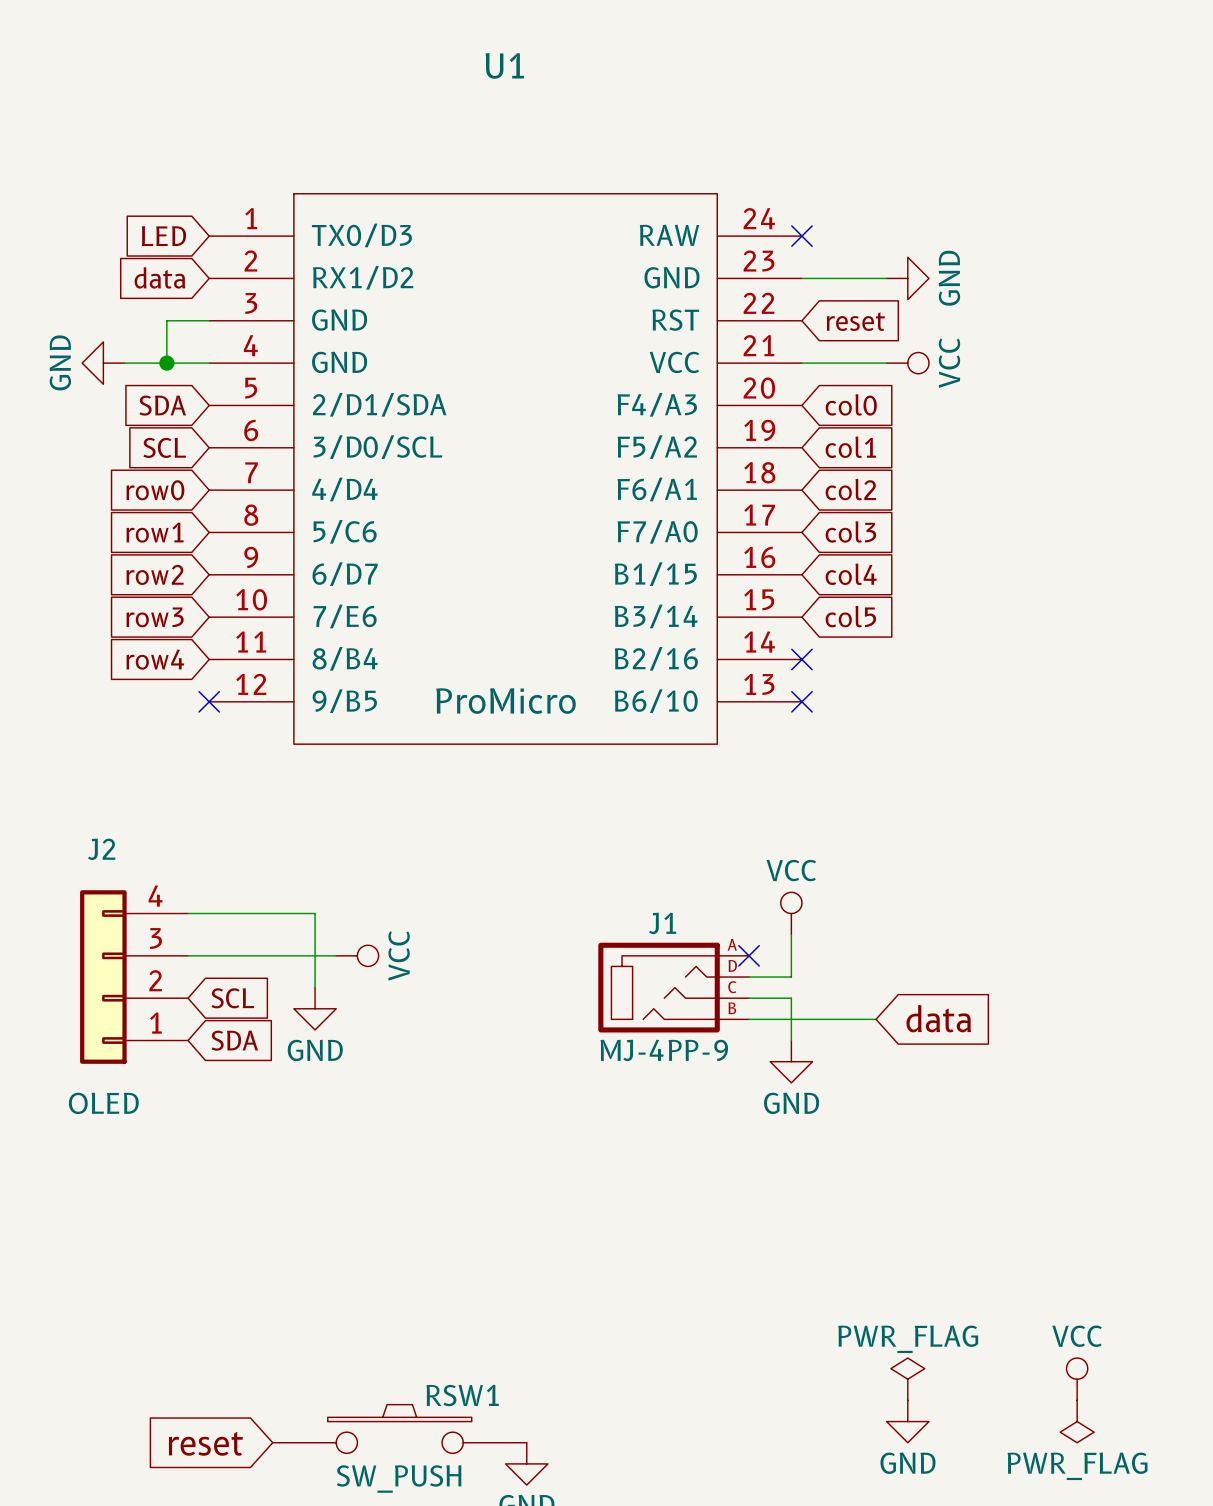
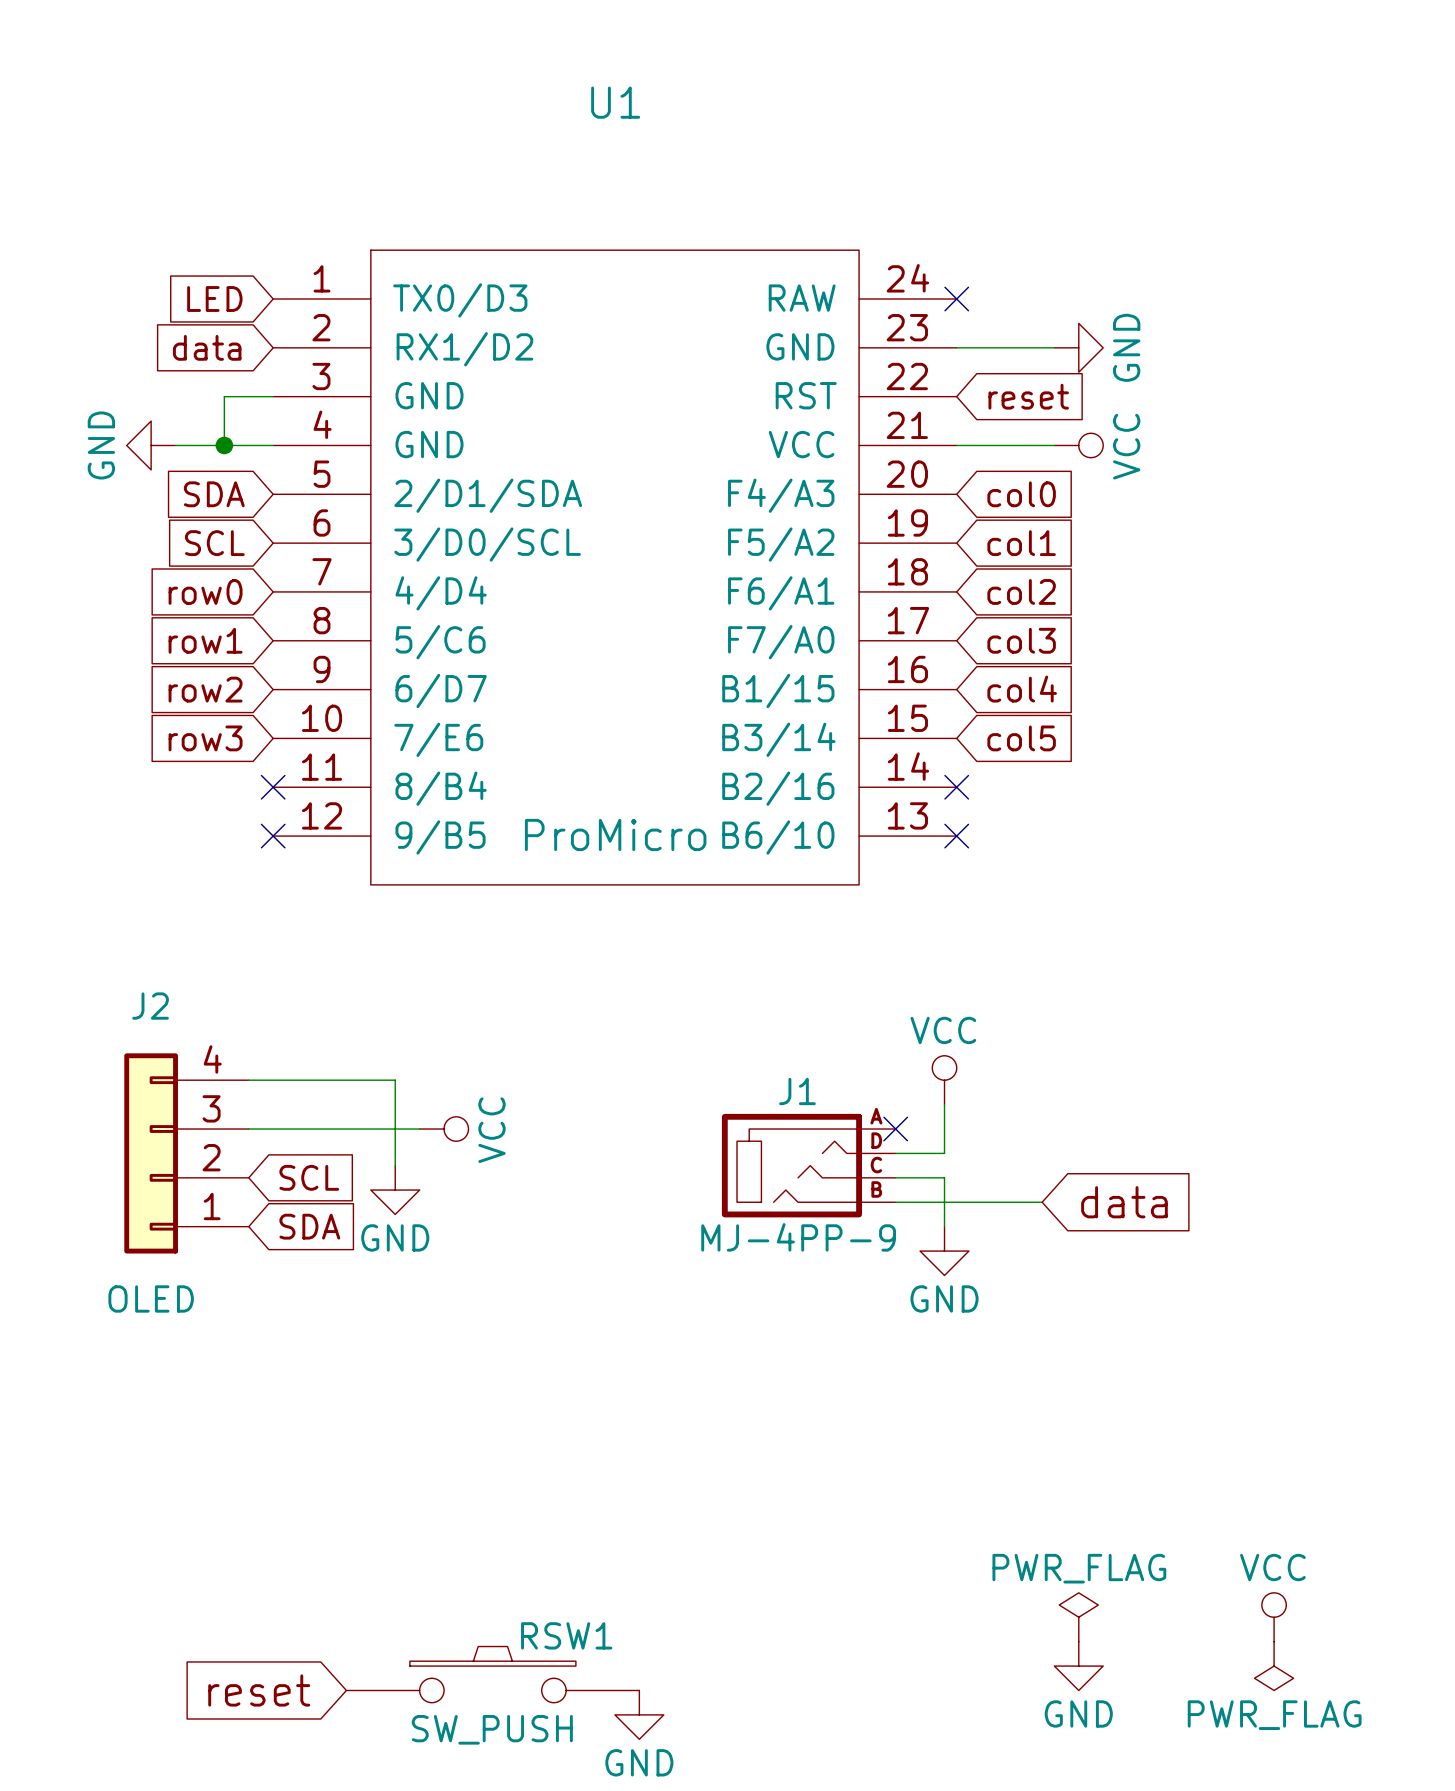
global label: row4 (155, 659) -> none
no-connect mark: none -> (273, 787)

